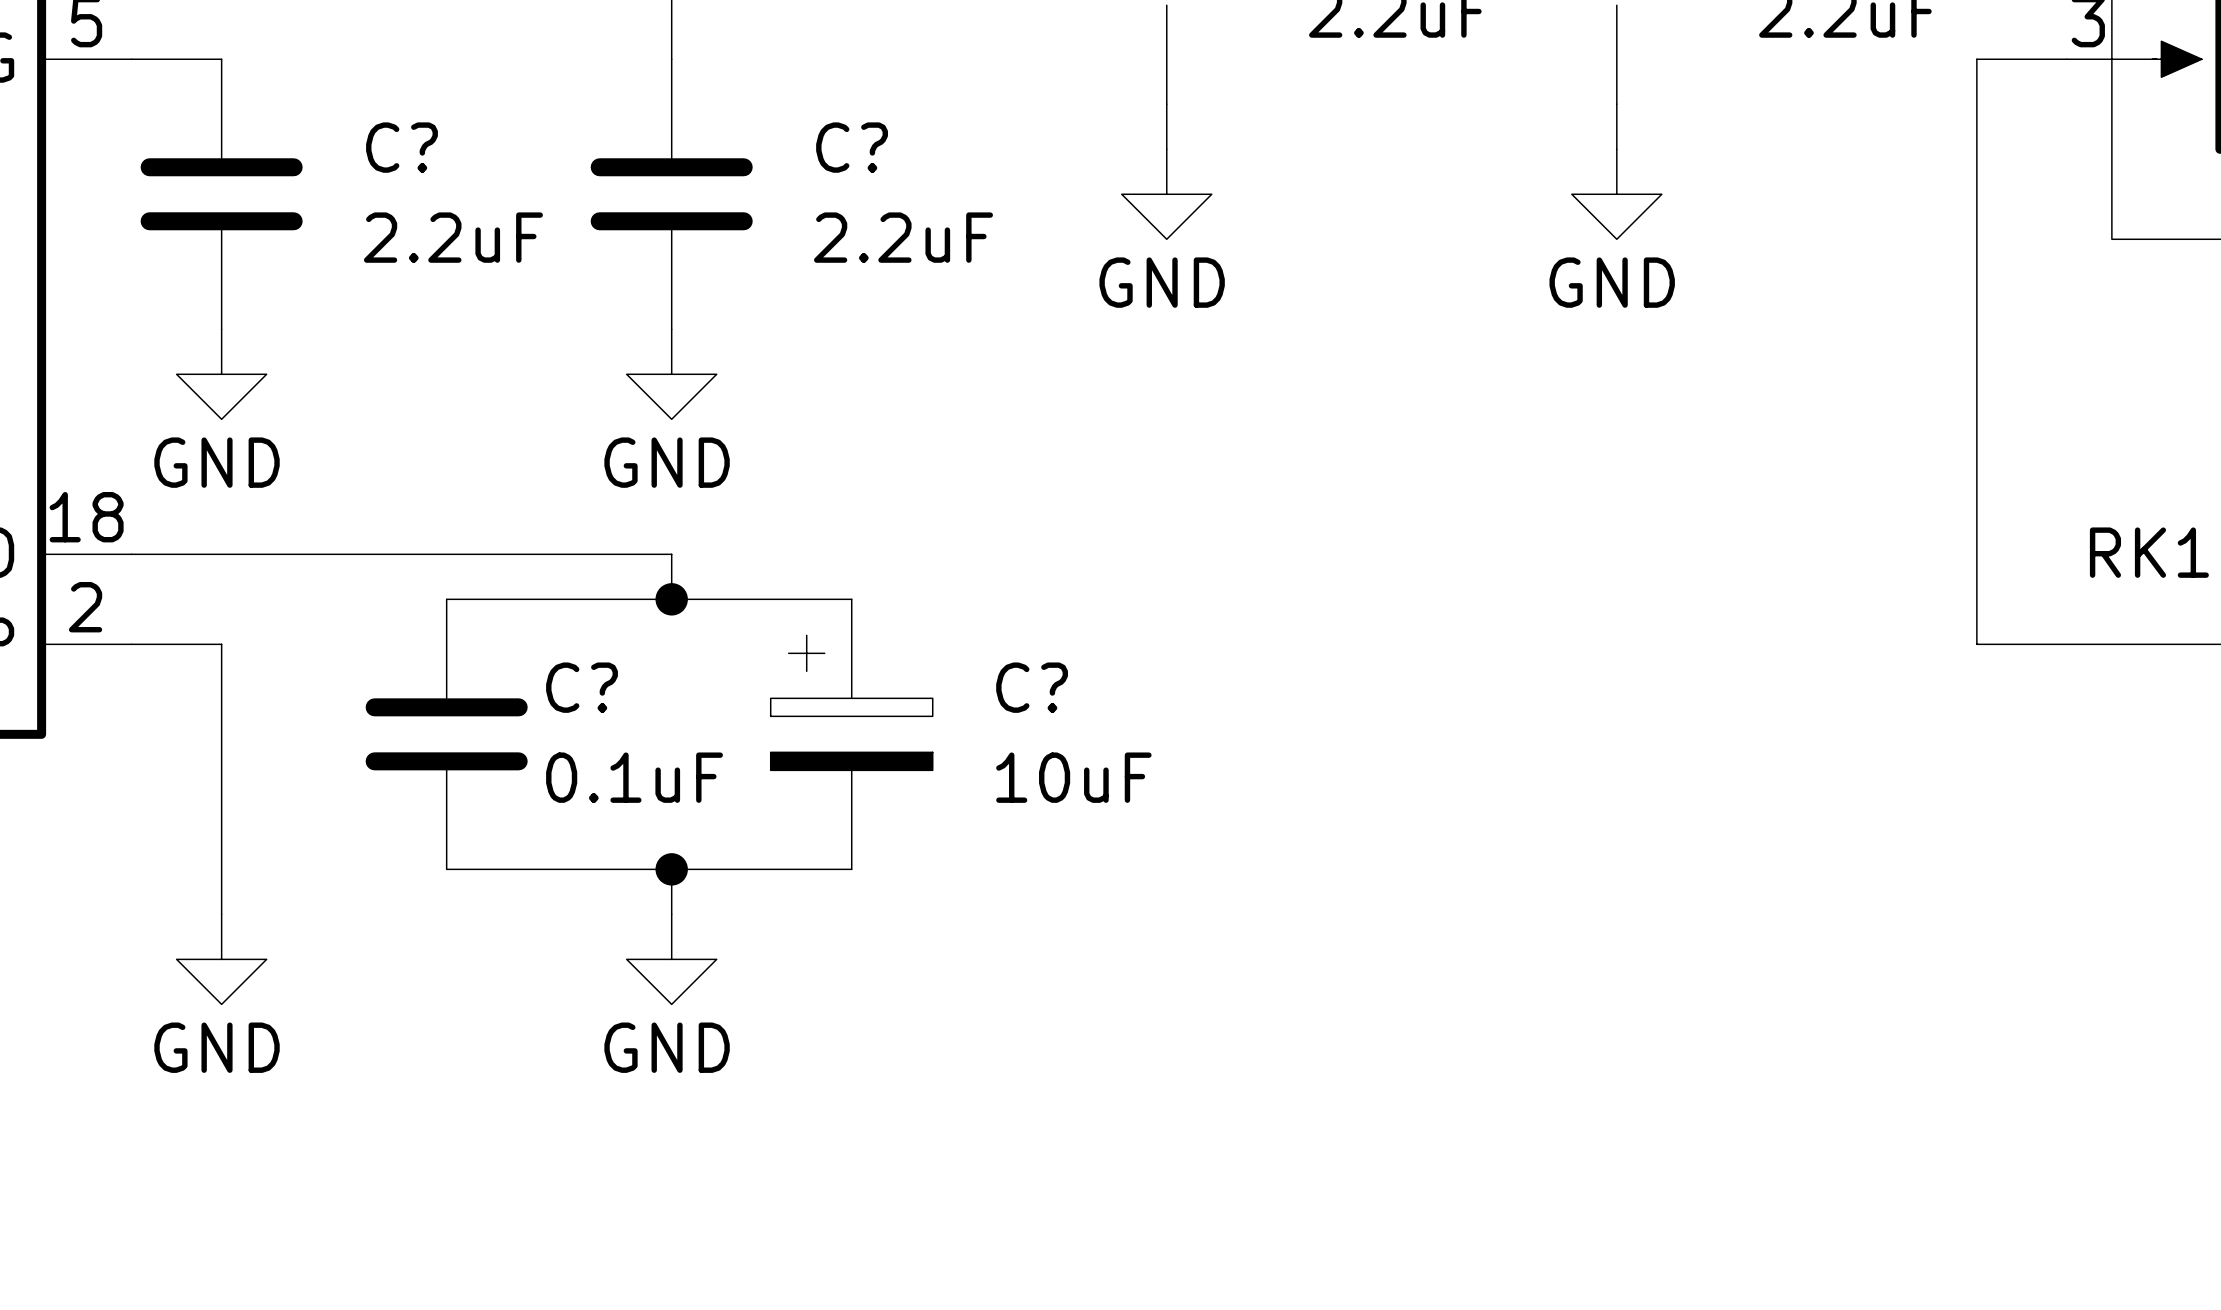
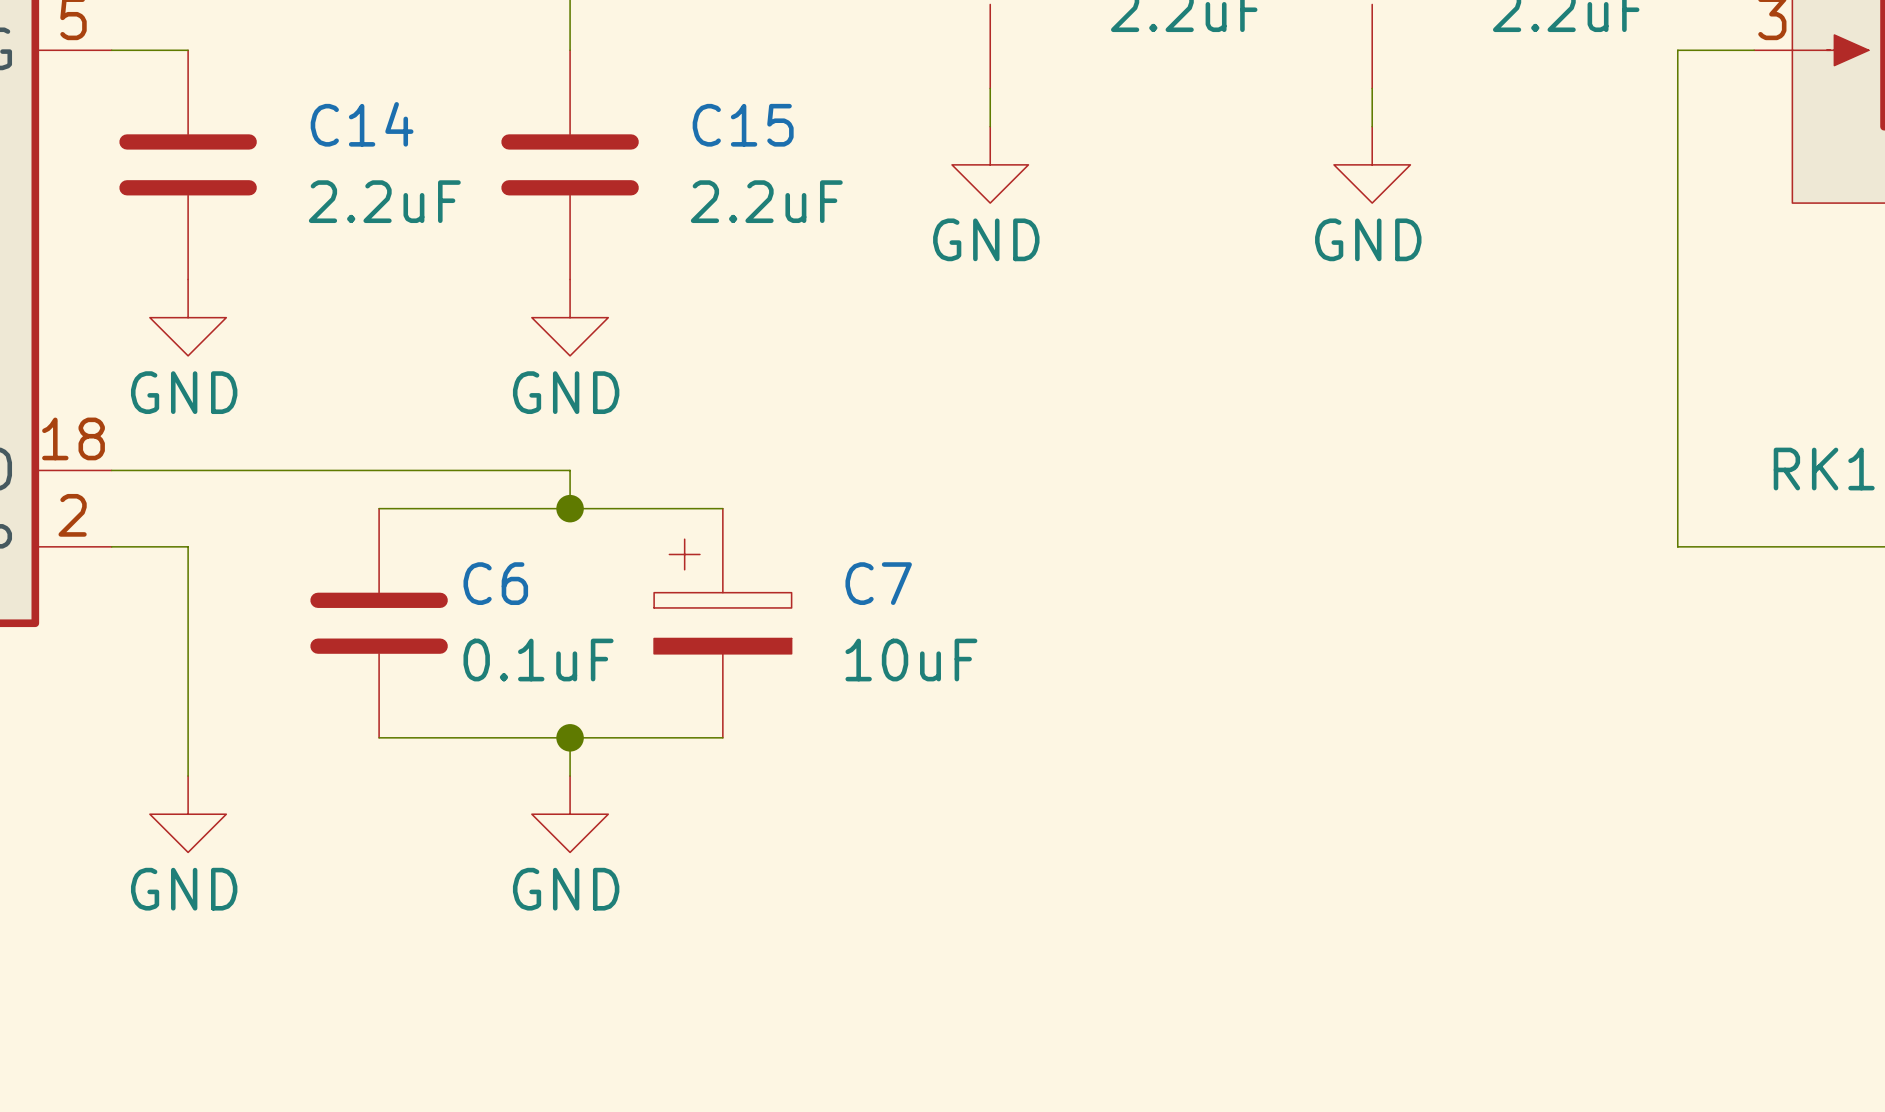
C? name: C? (402, 147) -> C14 (362, 124)
C? name: C? (852, 147) -> C15 (743, 125)
C? name: C? (582, 687) -> C6 (495, 583)
C? name: C? (1032, 687) -> C7 (878, 583)

